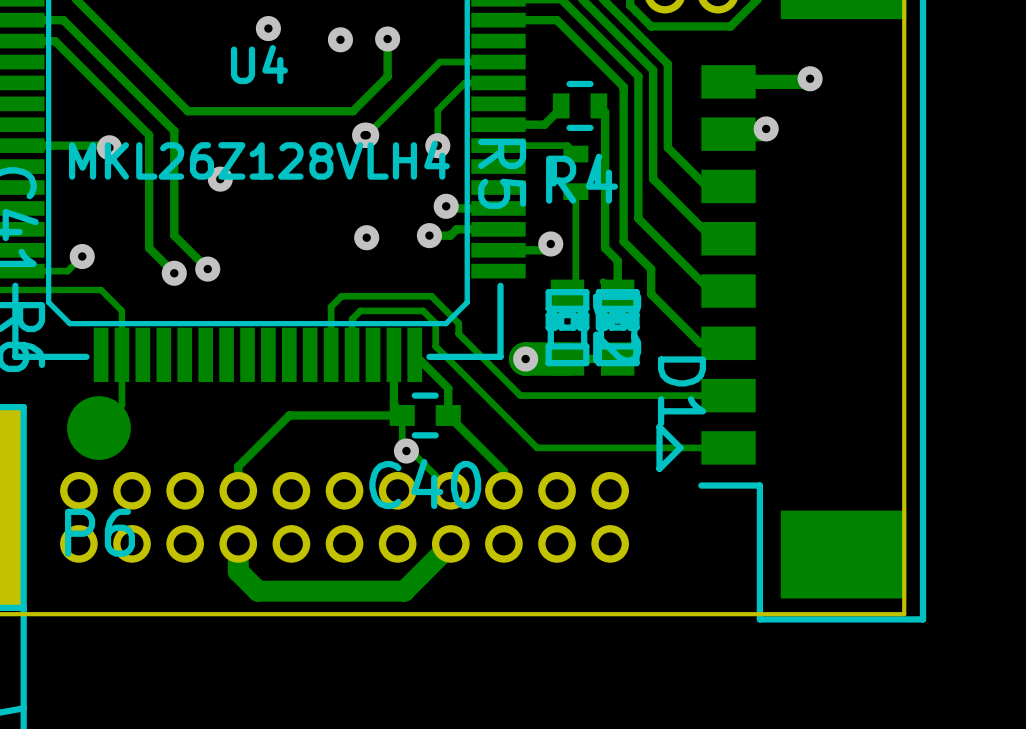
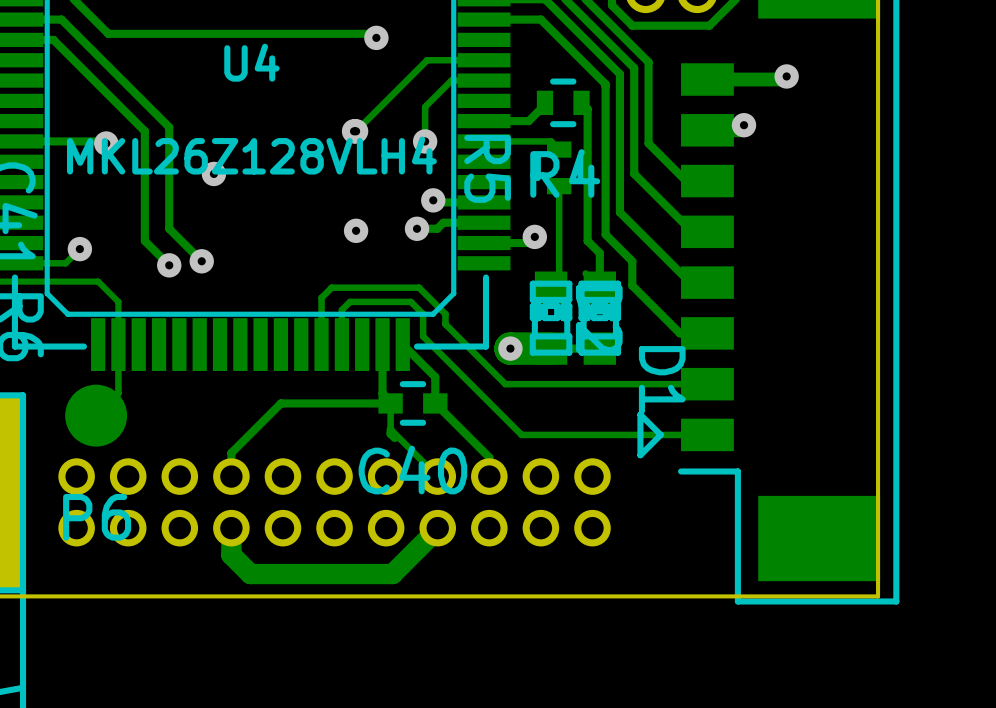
via: (268, 28) -> none
track: (111, 34) (187, 111) (353, 111) (387, 76) (387, 39) -> (108, 33) (372, 33)
via: (340, 39) -> none
via: (406, 451) -> none

